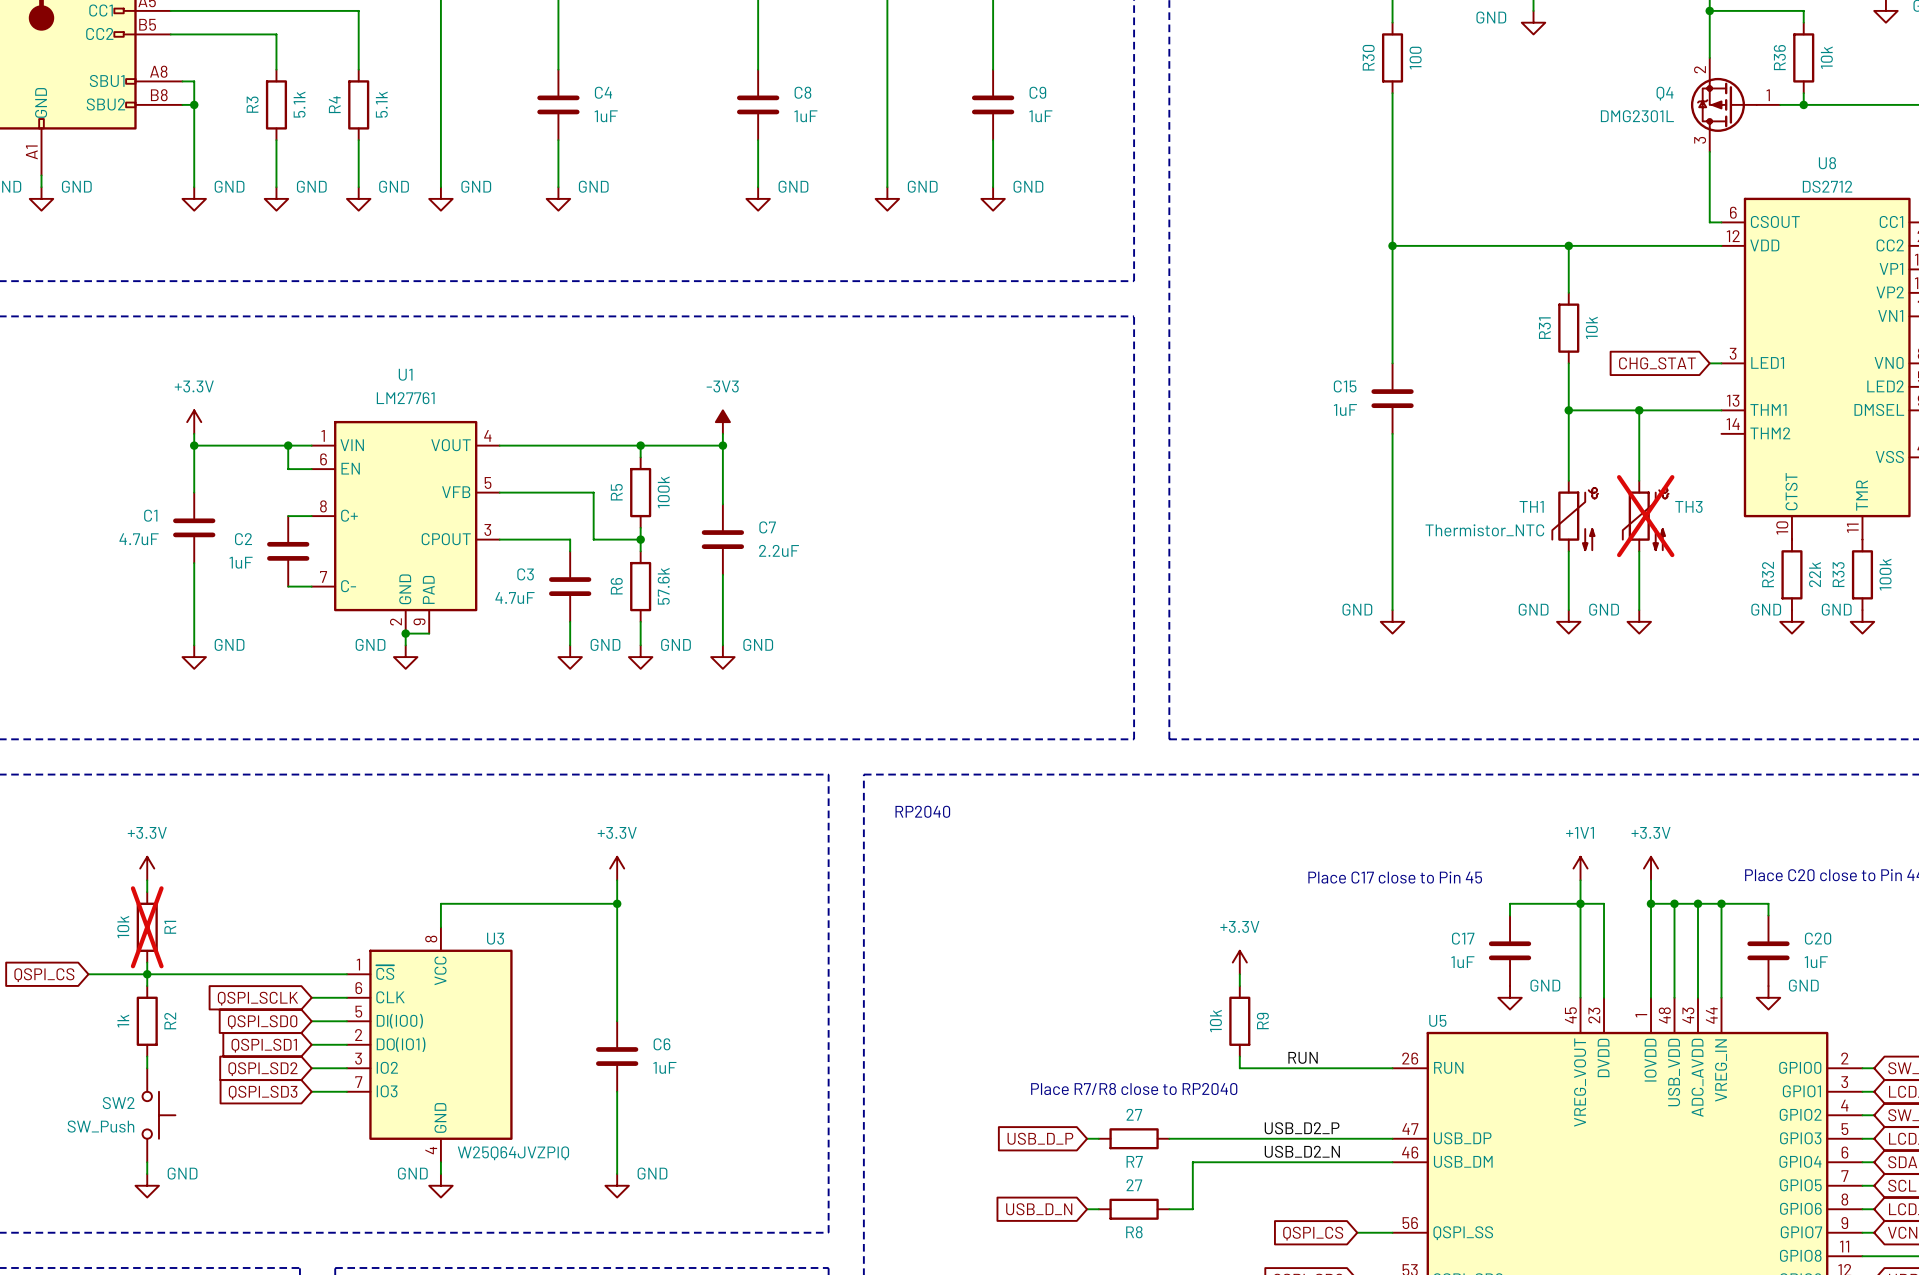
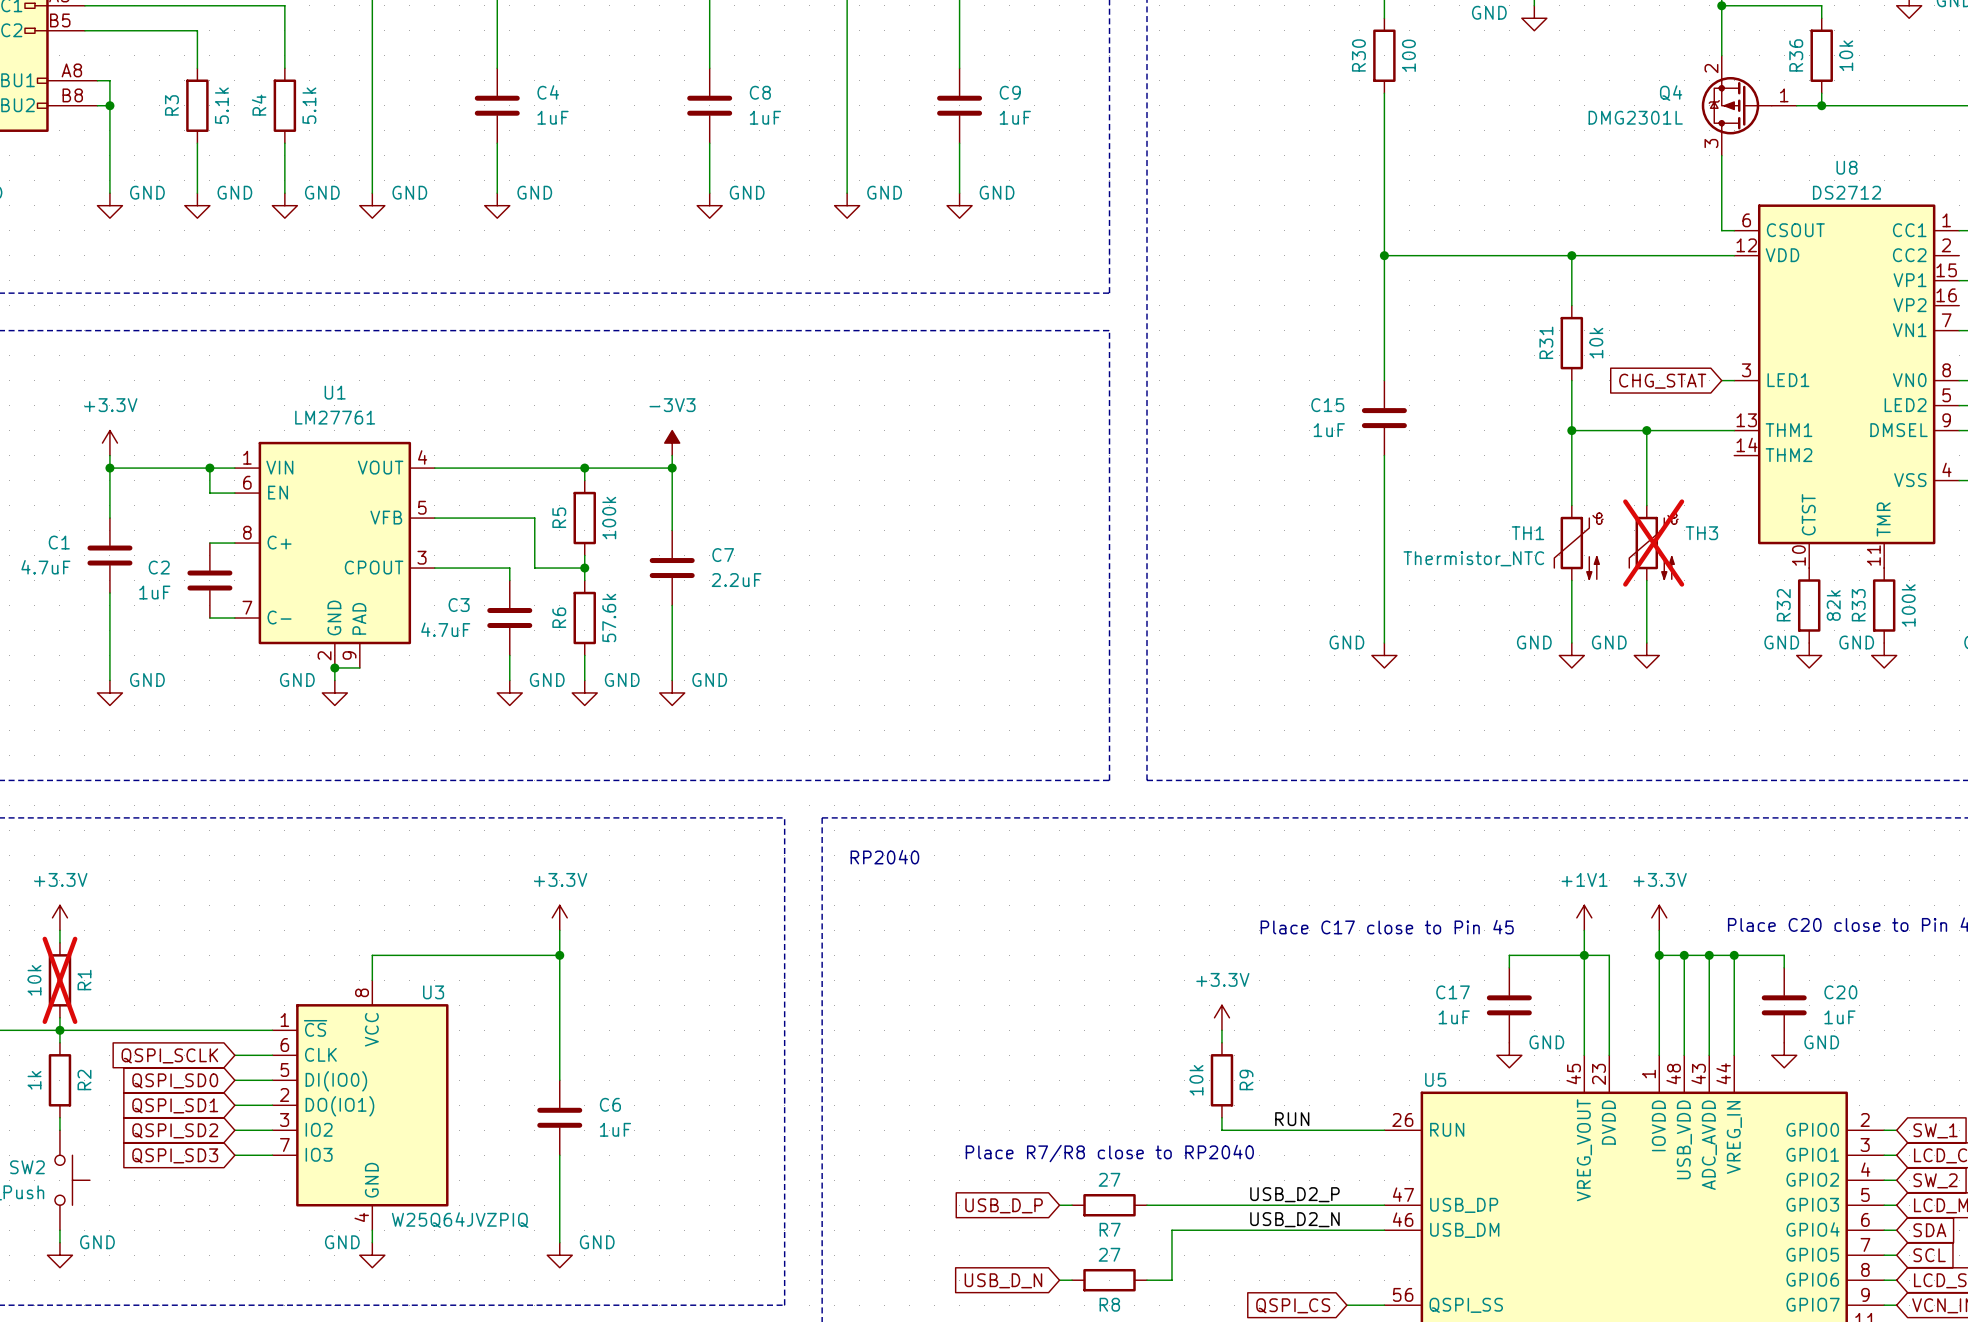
R32 value: 22k (1814, 574) -> 82k (1833, 605)

